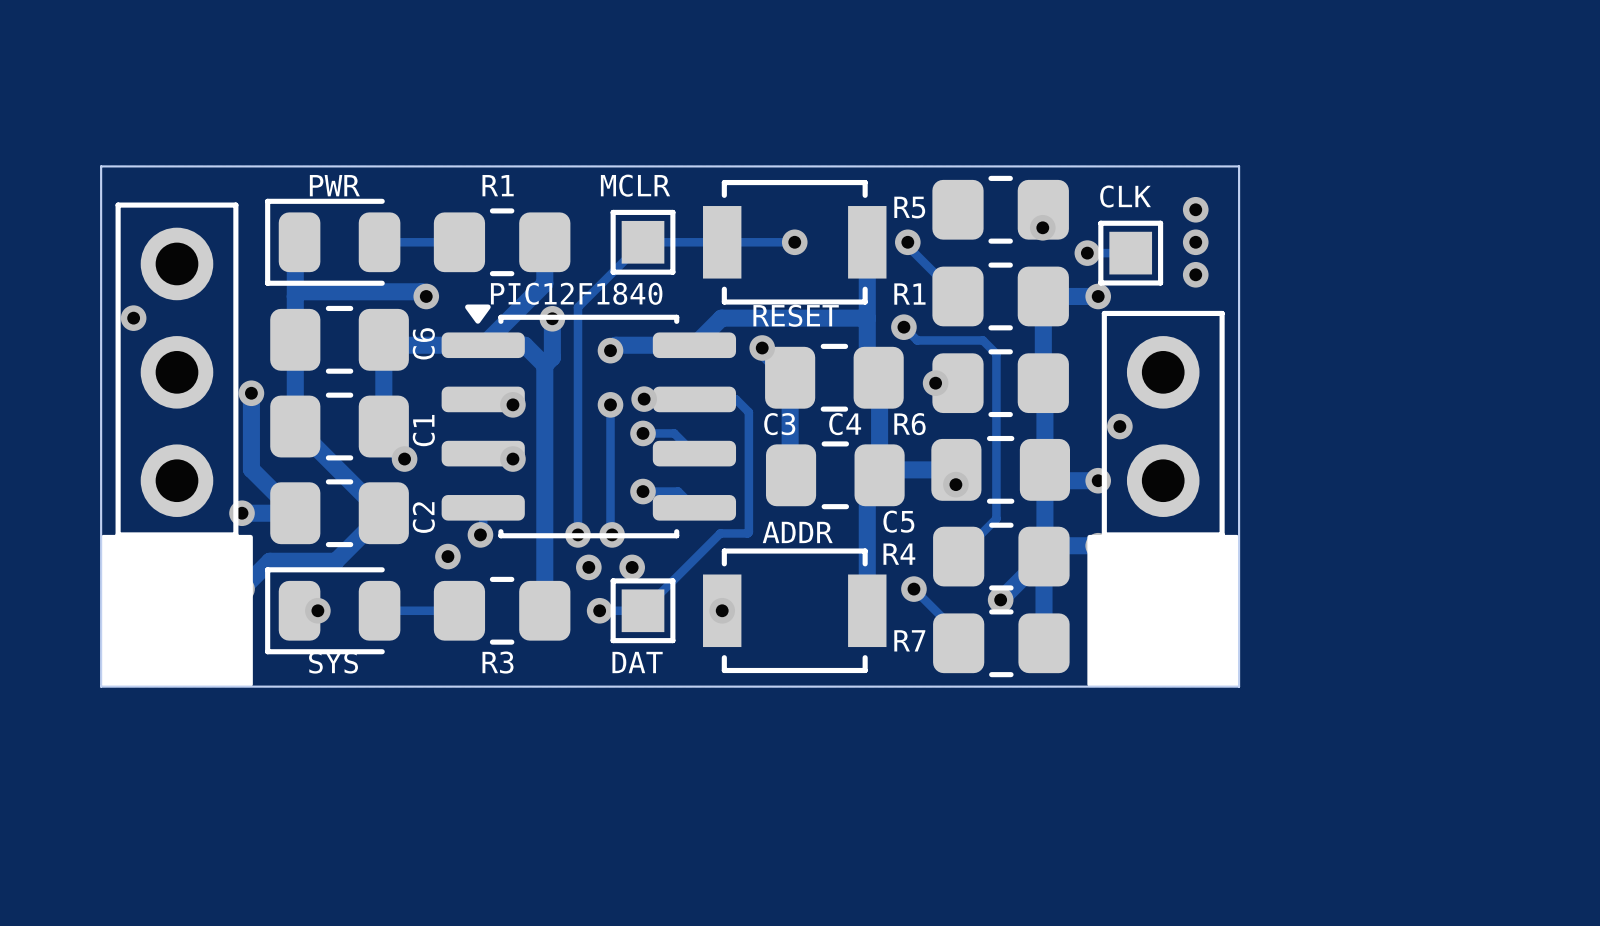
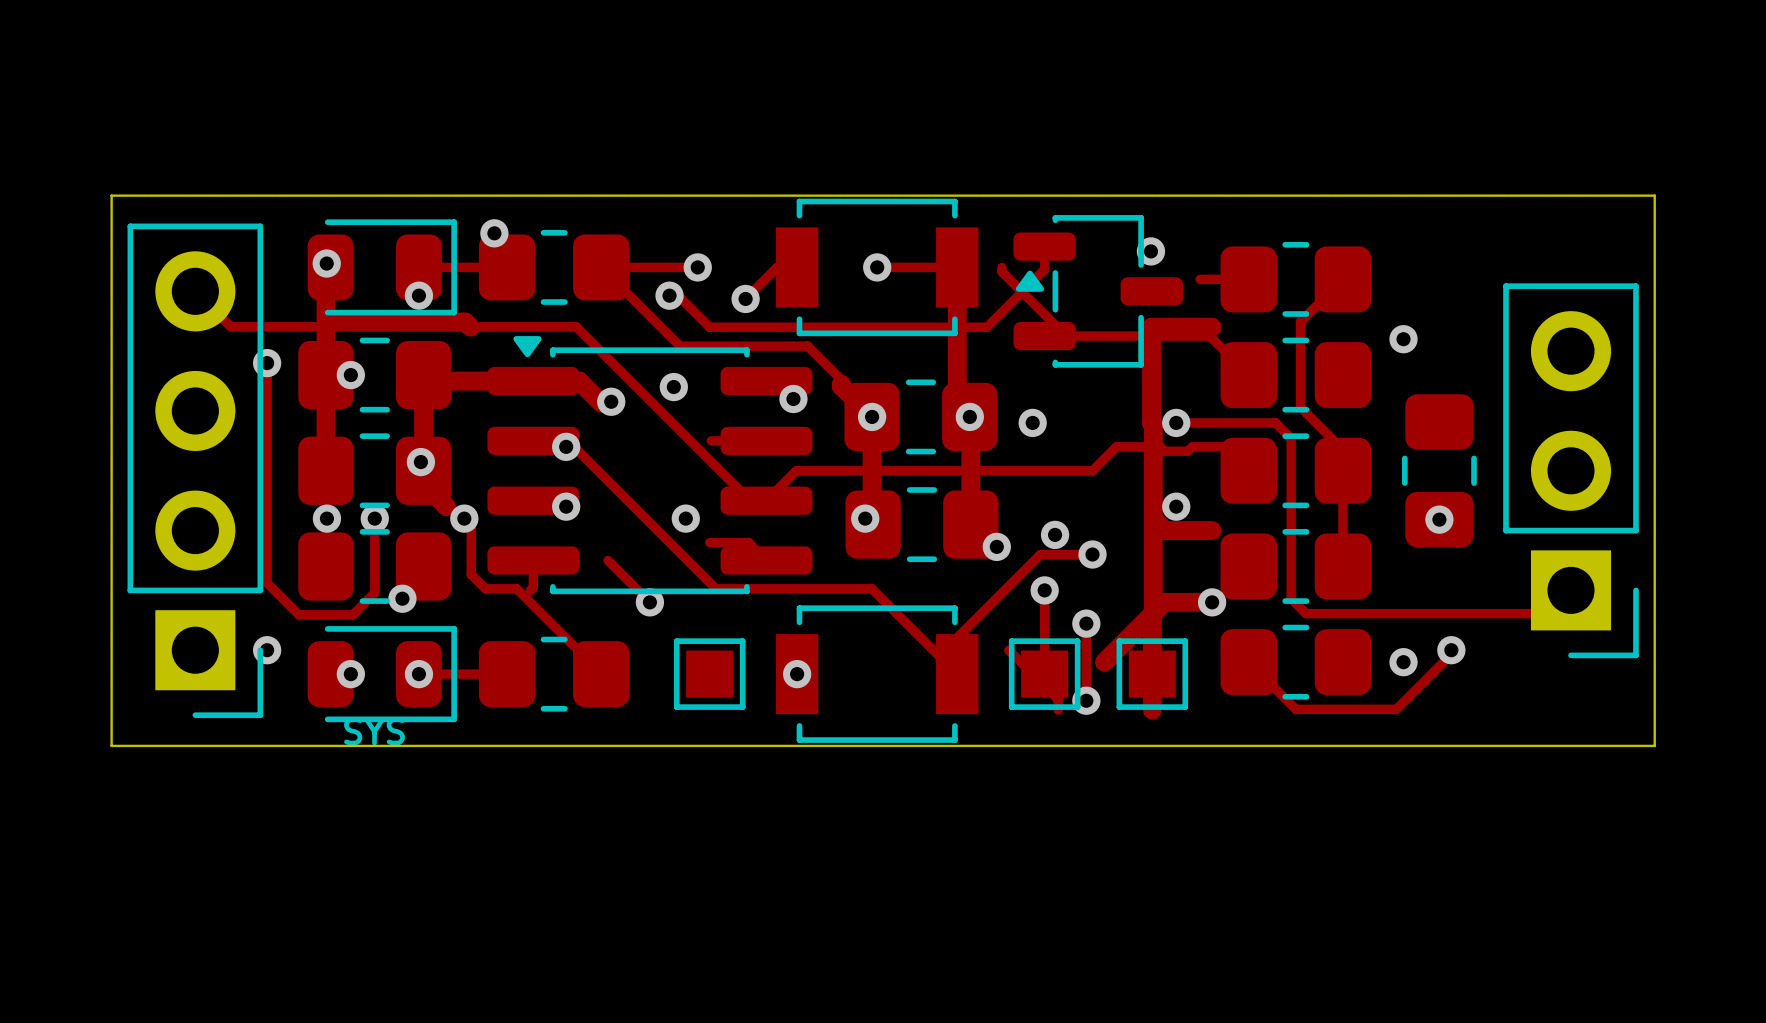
board edge: (101, 177) (101, 166) (1239, 166) (1239, 686) (101, 686) (101, 675) -> (111, 195) (1654, 195) (1654, 745) (111, 745)
text: PWR (334, 185) -> none
text: R1 (498, 185) -> none
text: MCLR (635, 185) -> none
text: CLK (1125, 196) -> none
text: R5 (909, 207) -> none
part: (1000, 209) -> none
via: (1195, 209) -> none
via: none -> (494, 233)
track: none -> (1044, 246) (1044, 269) (987, 327) (709, 327) (678, 295) (669, 295)
via: none -> (326, 263)
part rotation: 0° (332, 242) -> 180° (382, 267)
track: (544, 242) (544, 283) (483, 345) -> none
track: none -> (697, 267) (601, 267) (680, 346) (807, 346) (872, 410) (872, 416)
via: none -> (697, 267)
part: (643, 242) -> none
track: (704, 242) (643, 242) (577, 307) (577, 534) -> (777, 267) (745, 298)
track: (722, 242) (794, 242) -> (957, 267) (877, 267)
via: (907, 242) -> none
via: (1195, 242) -> none
via: (1087, 253) -> none
part: (1130, 253) -> none
part: none -> (1295, 279)
track: none -> (1342, 279) (1300, 321) (1300, 407) (1342, 449) (1342, 566)
track: none -> (195, 291) (230, 326) (576, 326) (750, 500) (766, 500) (796, 470) (1092, 470) (1116, 446) (1160, 446) (1164, 451) (1187, 451) (1192, 446) (1224, 446) (1248, 470)
part: none -> (1098, 291)
via: none -> (418, 295)
via: none -> (669, 295)
via: none -> (745, 298)
via: (1195, 274) -> none
text: PIC12F1840 (576, 293) -> none
text: R1 (909, 294) -> none
via: (426, 296) -> none
part: (1000, 296) -> none
via: (1098, 296) -> none
track: none -> (1044, 336) (1209, 336) (1248, 375)
via: none -> (1403, 339)
text: RESET (796, 315) -> none
via: (133, 318) -> none
track: (552, 318) (552, 357) (544, 365) (544, 610) -> (464, 518) (471, 525) (471, 574) (485, 588) (516, 588) (602, 674)
via: (552, 318) -> none
track: (867, 318) (721, 318) (694, 345) (615, 345) (610, 350) -> none
track: (903, 327) (917, 340) (982, 340) (996, 353) (996, 518) (958, 556) -> none
via position: (903, 327) -> (969, 416)
track: none -> (267, 363) (267, 582) (298, 614) (352, 614) (374, 592) (374, 518)
via: none -> (267, 363)
via: none -> (350, 375)
part: none -> (1295, 375)
text: C6 (423, 343) -> none
via: (762, 348) -> none
via: none -> (793, 399)
via: none -> (611, 401)
via: none -> (872, 416)
part: (1000, 383) -> none
track: none -> (1176, 422) (1275, 422) (1291, 438) (1291, 598) (1306, 613) (1547, 613) (1570, 590)
via: none -> (1176, 422)
track: (251, 393) (251, 469) (295, 513) (242, 513) -> none
via: (251, 393) -> none
via: (644, 399) -> none
track: (694, 399) (736, 399) (748, 412) (747, 533) -> (957, 674) (871, 588) (825, 588)
track: (610, 404) (610, 533) (612, 534) -> none
via: (610, 404) -> none
via: none -> (420, 462)
text: C3 (779, 424) -> none
text: C4 (845, 424) -> none
text: R6 (909, 424) -> none
via: (1119, 426) -> none
part: none -> (1295, 470)
track: (296, 427) (383, 513) (335, 561) (269, 561) (242, 589) -> none
text: C1 (423, 430) -> none
track: (643, 433) (674, 433) (694, 453) -> none
via: (643, 433) -> none
via position: (404, 459) -> (464, 518)
via: none -> (1176, 506)
via: none -> (326, 518)
via: none -> (374, 518)
via: none -> (865, 518)
track: (956, 469) (885, 469) (867, 487) (867, 577) -> (1092, 554) (1040, 554) (957, 637)
part rotation: 0° (1000, 469) -> 90° clockwise (1439, 470)
part position: (1000, 469) -> (1439, 470)
via: none -> (1439, 519)
via: (1098, 480) -> none
part position: (1163, 480) -> (1570, 470)
via position: (643, 491) -> (685, 518)
via: none -> (996, 546)
via: none -> (1092, 554)
track: none -> (608, 560) (649, 602)
via: (242, 513) -> none
part: none -> (1295, 566)
text: C2 (423, 517) -> none
text: C5 (898, 521) -> none
text: ADDR (797, 532) -> none
track: (720, 533) (643, 610) (599, 610) -> (795, 588) (715, 588) (568, 440) (560, 440)
drawing: [101, 534, 253, 687] -> none
via: (480, 534) -> none
via: (577, 534) -> none
via: (612, 534) -> none
track: none -> (1044, 590) (1044, 662)
via: none -> (1044, 590)
drawing: [1087, 534, 1240, 687] -> none
via: none -> (402, 598)
via: none -> (649, 602)
text: R4 (899, 554) -> none
via: (447, 556) -> none
part: (1001, 556) -> none
track: none -> (1086, 623) (1086, 700)
via: none -> (1086, 623)
via: (588, 567) -> none
via: (632, 567) -> none
via: (913, 589) -> none
track: none -> (1451, 650) (1451, 654) (1396, 709) (1295, 709) (1248, 662)
via: none -> (1451, 650)
via: (1000, 599) -> none
part: none -> (1295, 662)
via: none -> (1403, 662)
part rotation: 0° (332, 610) -> 180° (382, 674)
via: none -> (418, 674)
via: (599, 610) -> none
part: none -> (1044, 674)
part: none -> (1152, 674)
via: none -> (1086, 700)
text: R7 (909, 640) -> none
part: (1001, 643) -> none
text: R3 (497, 662) -> none
text: DAT (637, 662) -> none

